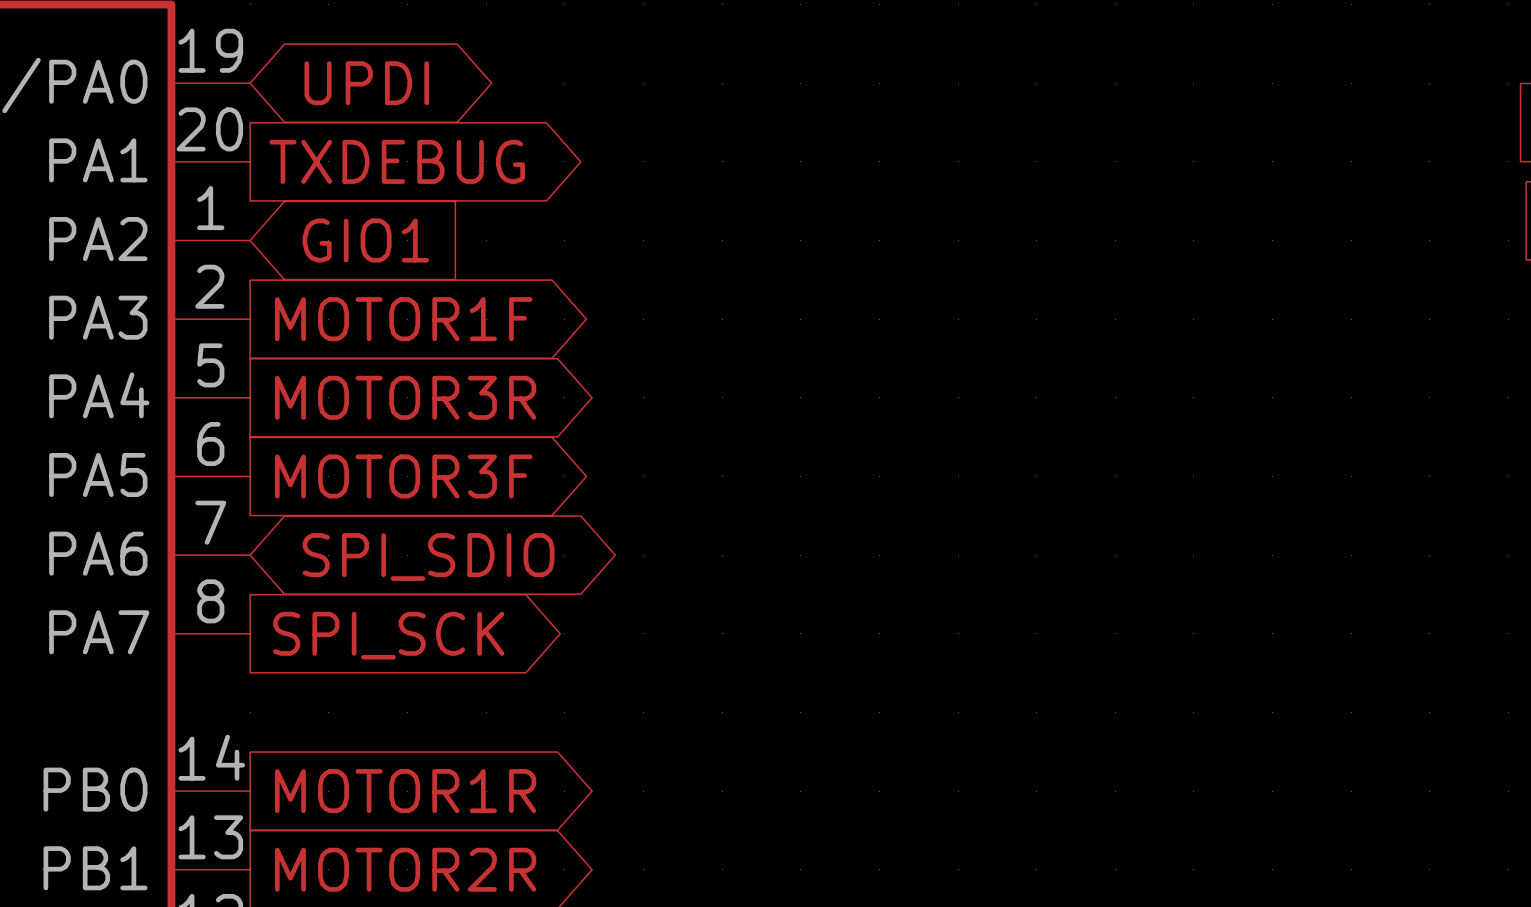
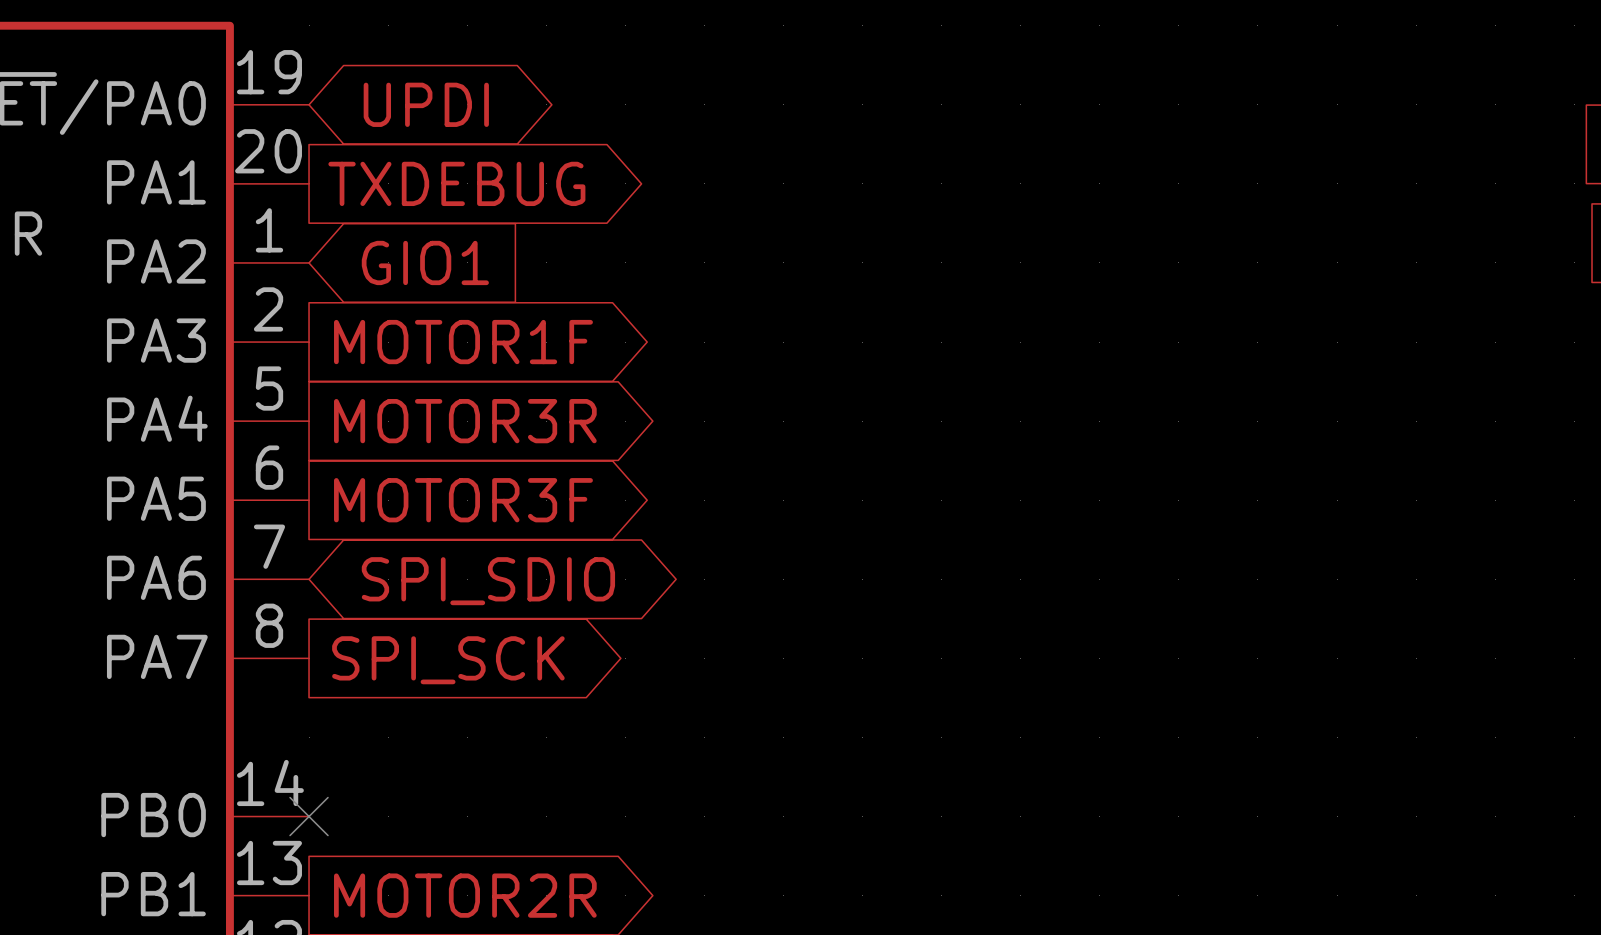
no-connect mark: none -> (309, 816)
global label: MOTOR1R (405, 791) -> none

